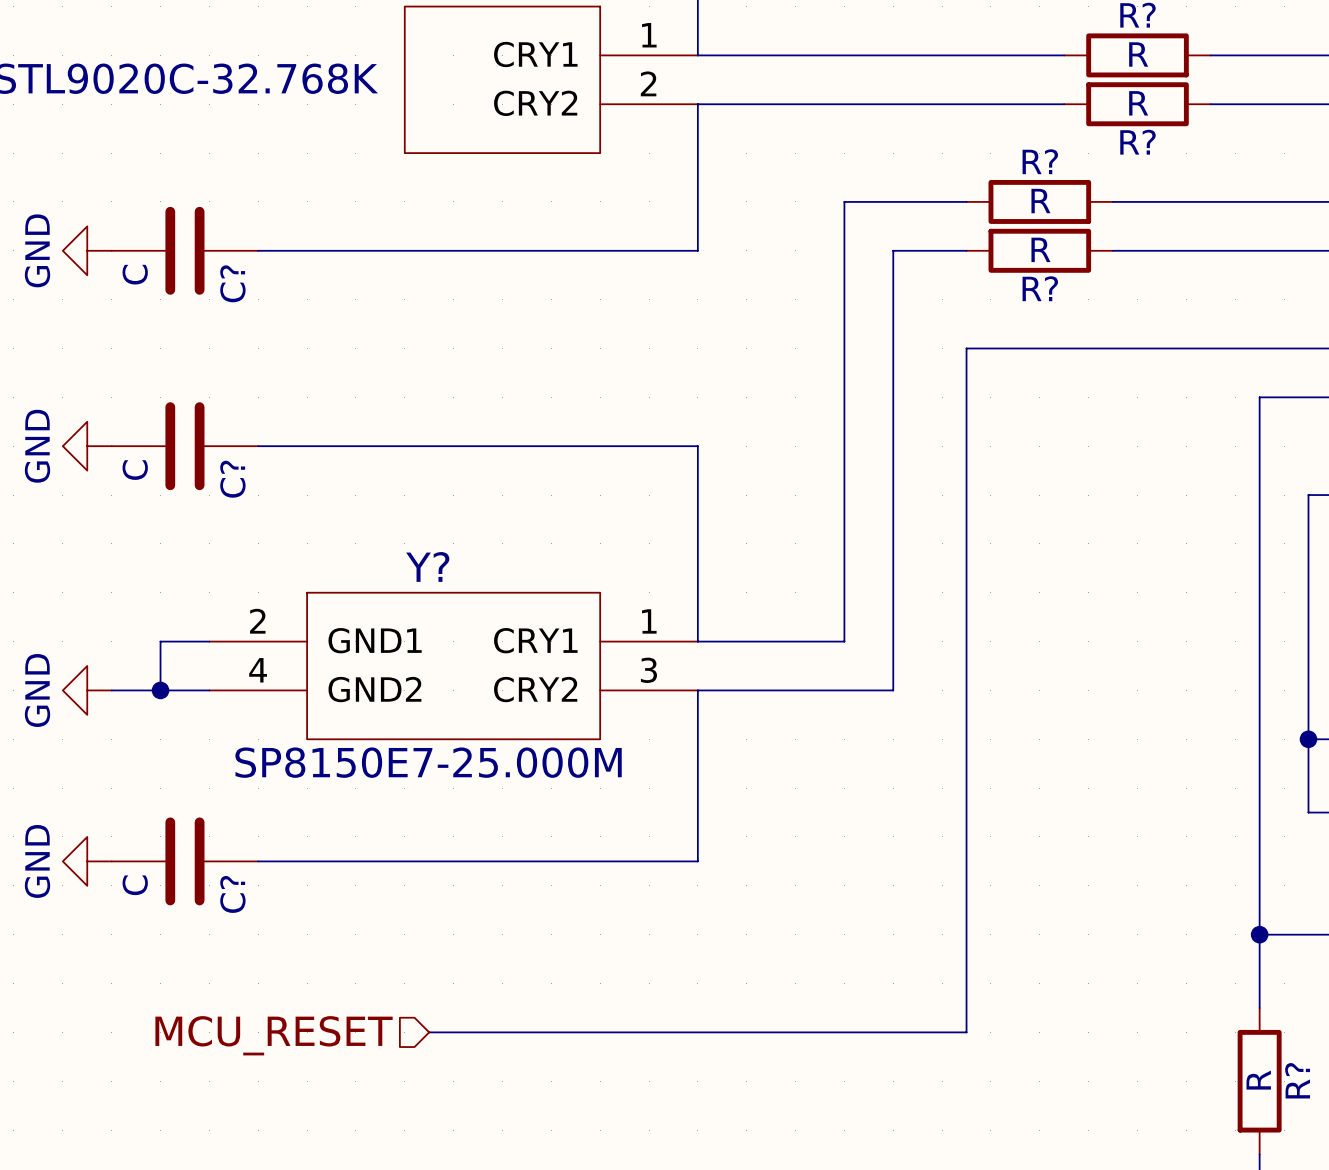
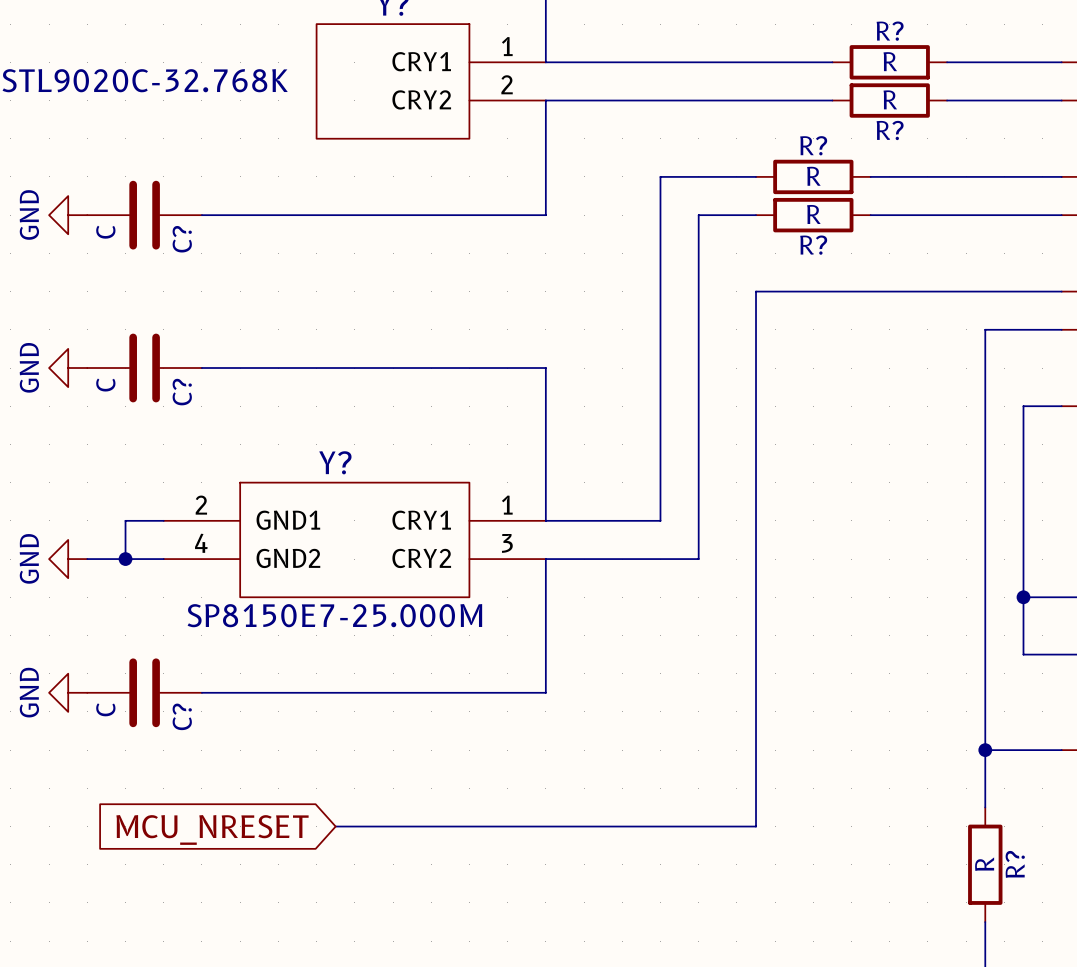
hierarchical label: MCU_RESET (274, 1035) -> none
global label: none -> MCU_NRESET (212, 829)

